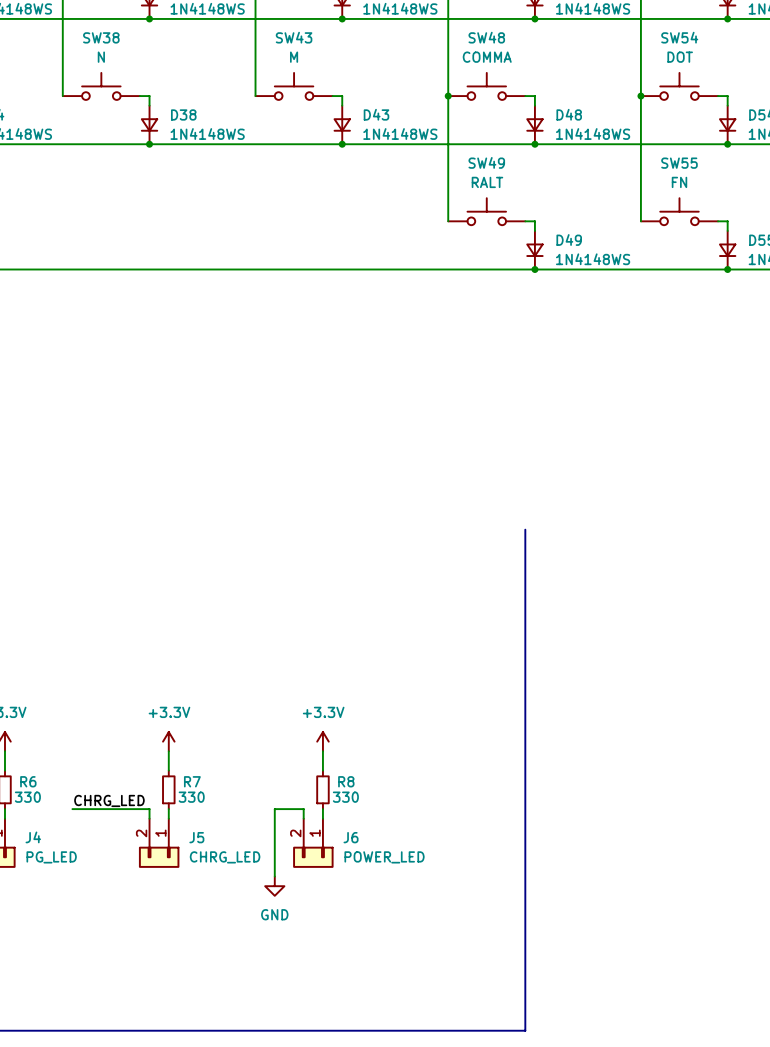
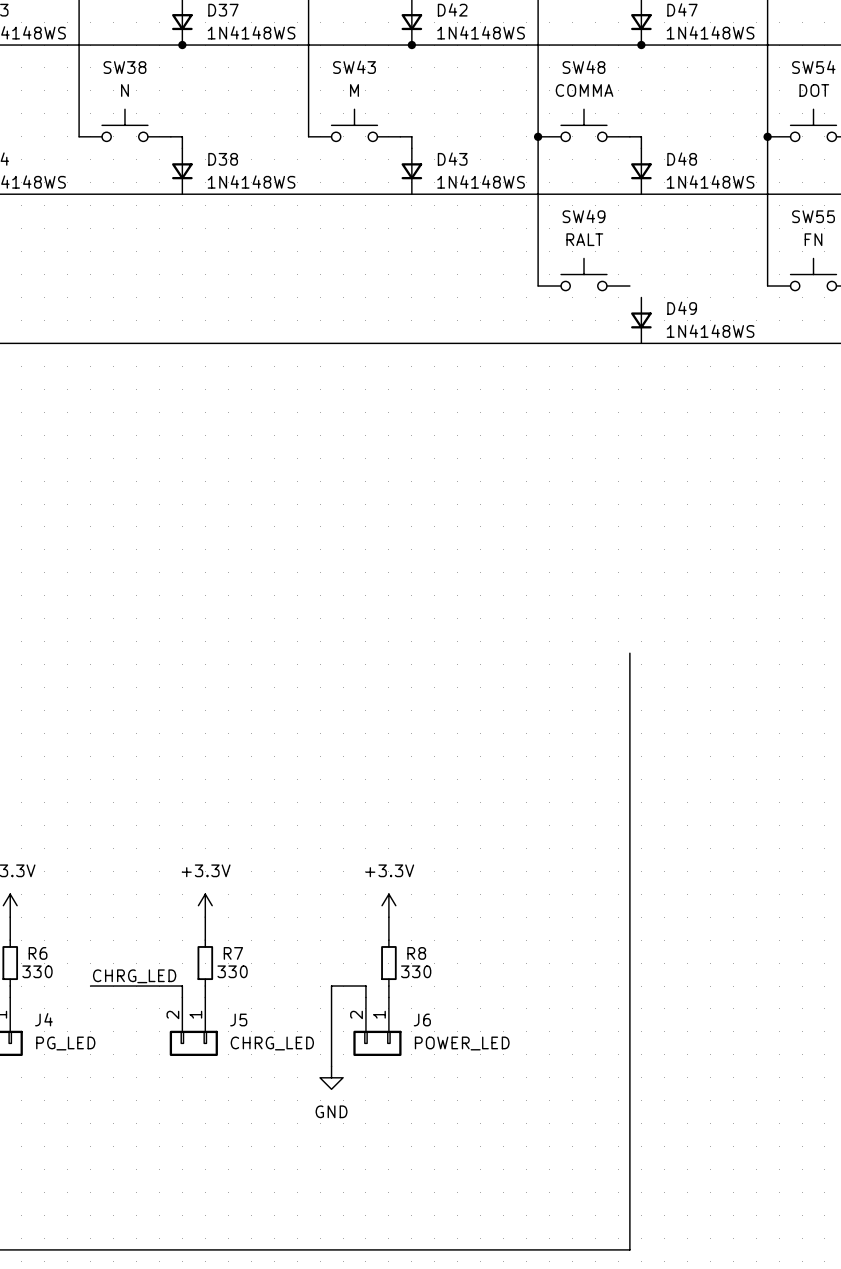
junction: (149, 144) -> none
junction: (342, 144) -> none
junction: (534, 144) -> none
wire: (525, 221) (534, 221) (534, 230) -> none
junction: (534, 269) -> none

